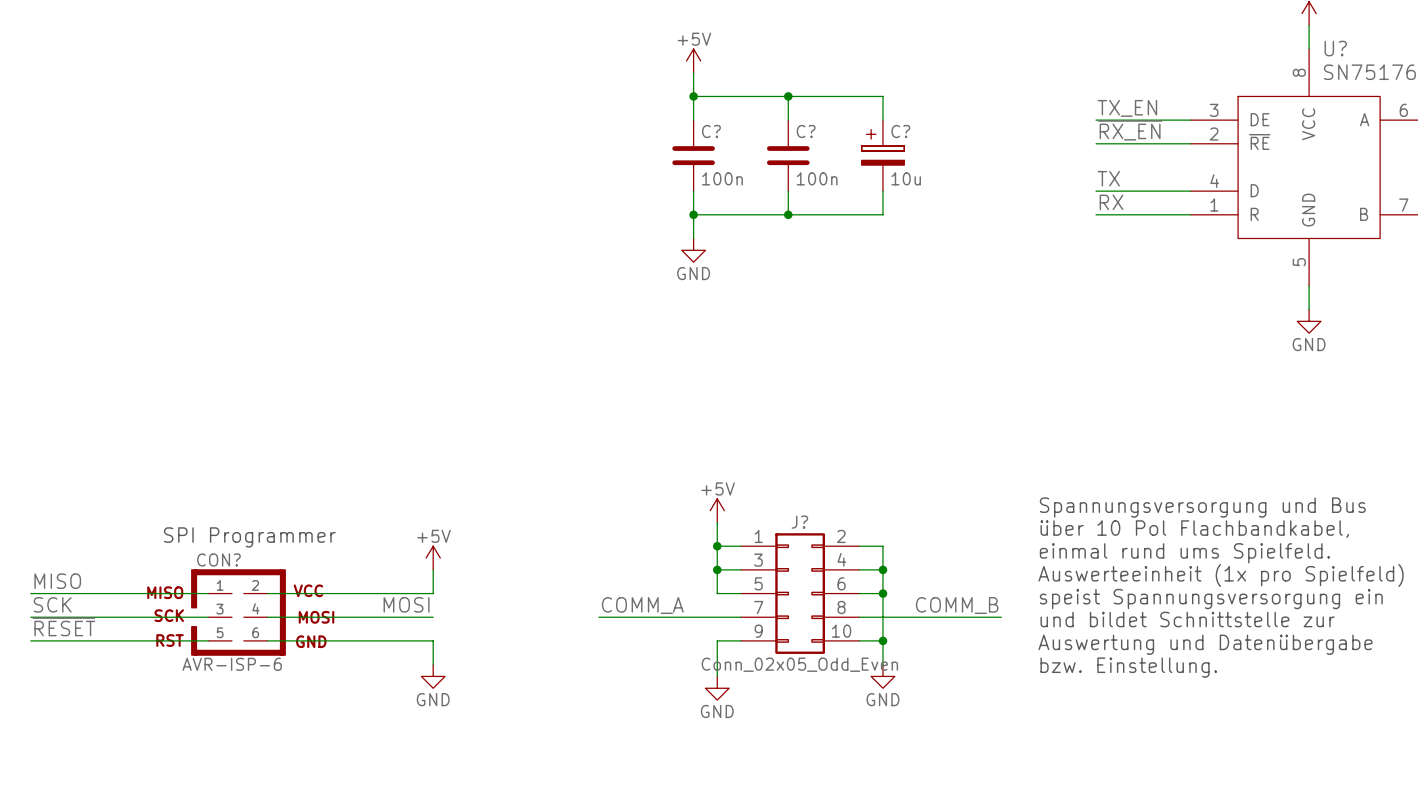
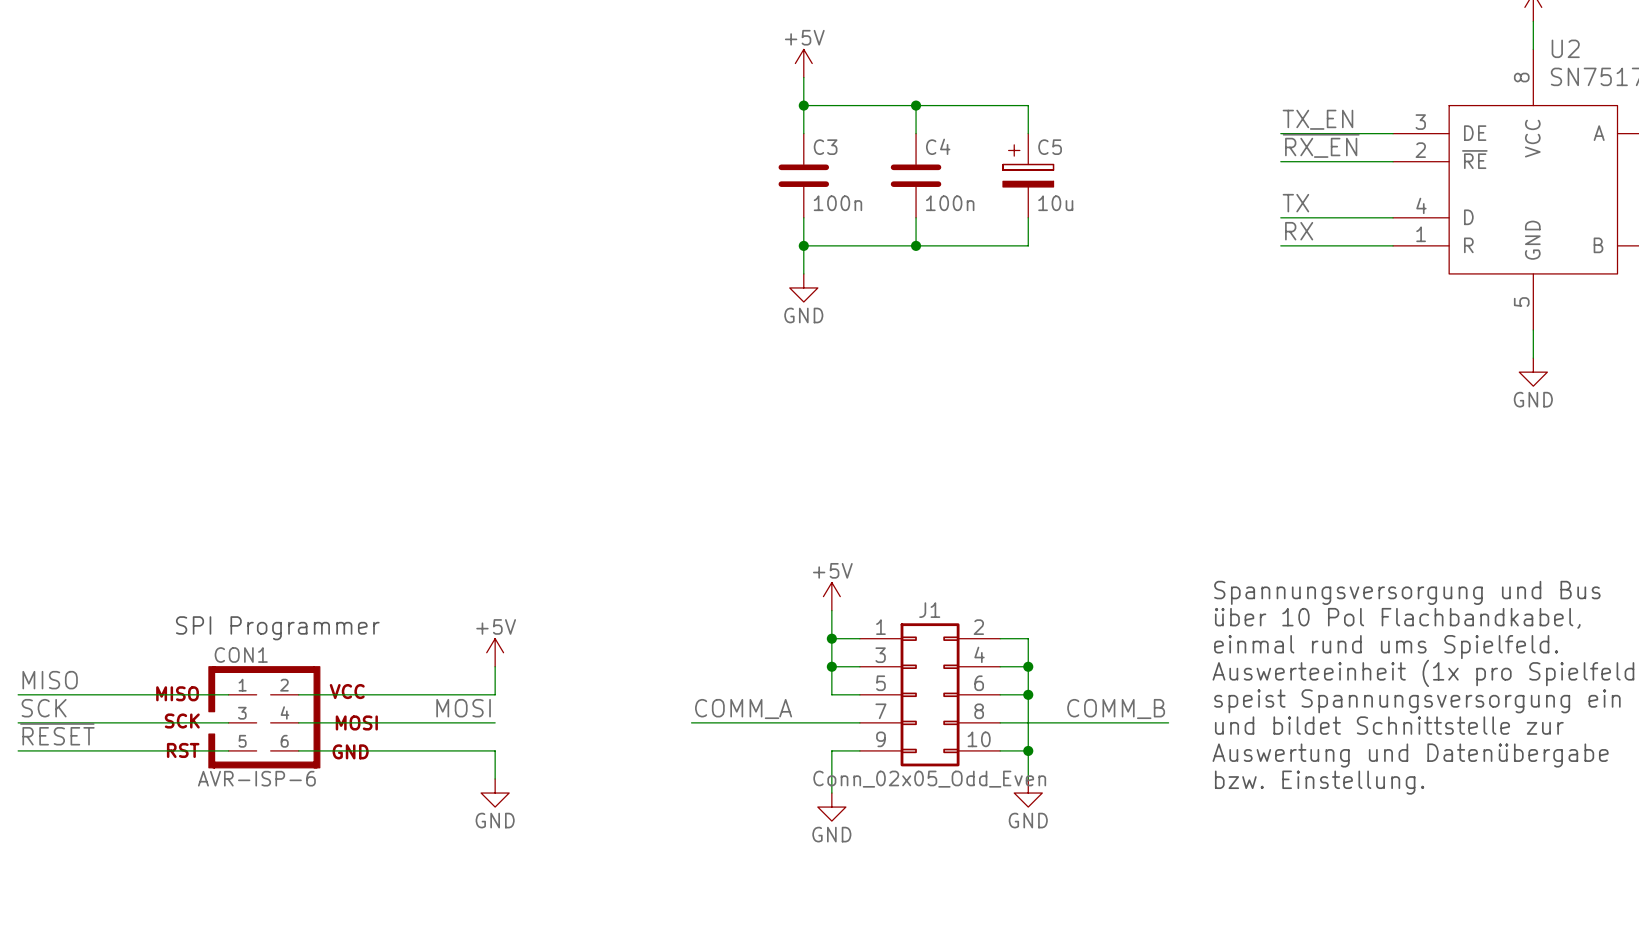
U? name: U? (1335, 48) -> U2 (1565, 48)
C? name: C? (711, 131) -> C3 (825, 147)
C? name: C? (806, 131) -> C4 (938, 146)
C? name: C? (900, 131) -> C5 (1050, 147)
J? name: J? (799, 522) -> J1 (929, 610)
CON? name: CON? (218, 559) -> CON1 (241, 655)

